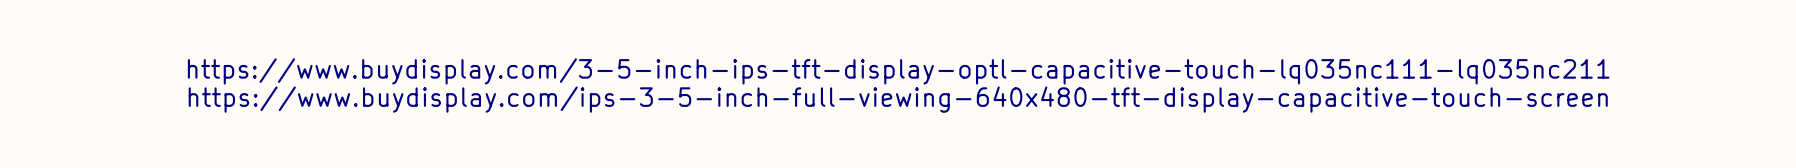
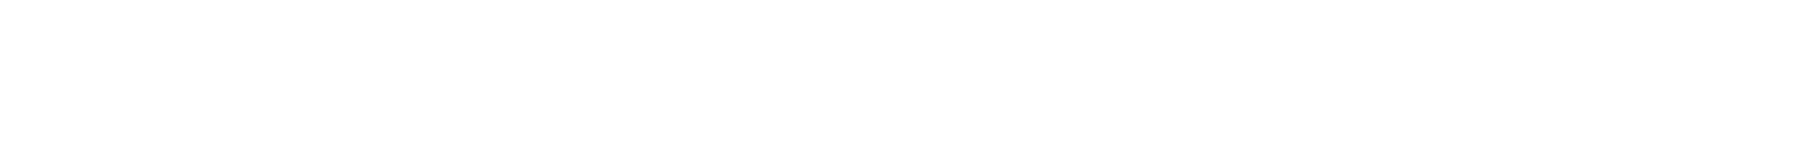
text: https://www.buydisplay.com/3-5-inch-ips-tft-display-optl-capacitive-touch-lq035nc111-lq035nc211 (898, 71) -> none
text: https://www.buydisplay.com/ips-3-5-inch-full-viewing-640x480-tft-display-capacitive-touch-screen (898, 99) -> none

